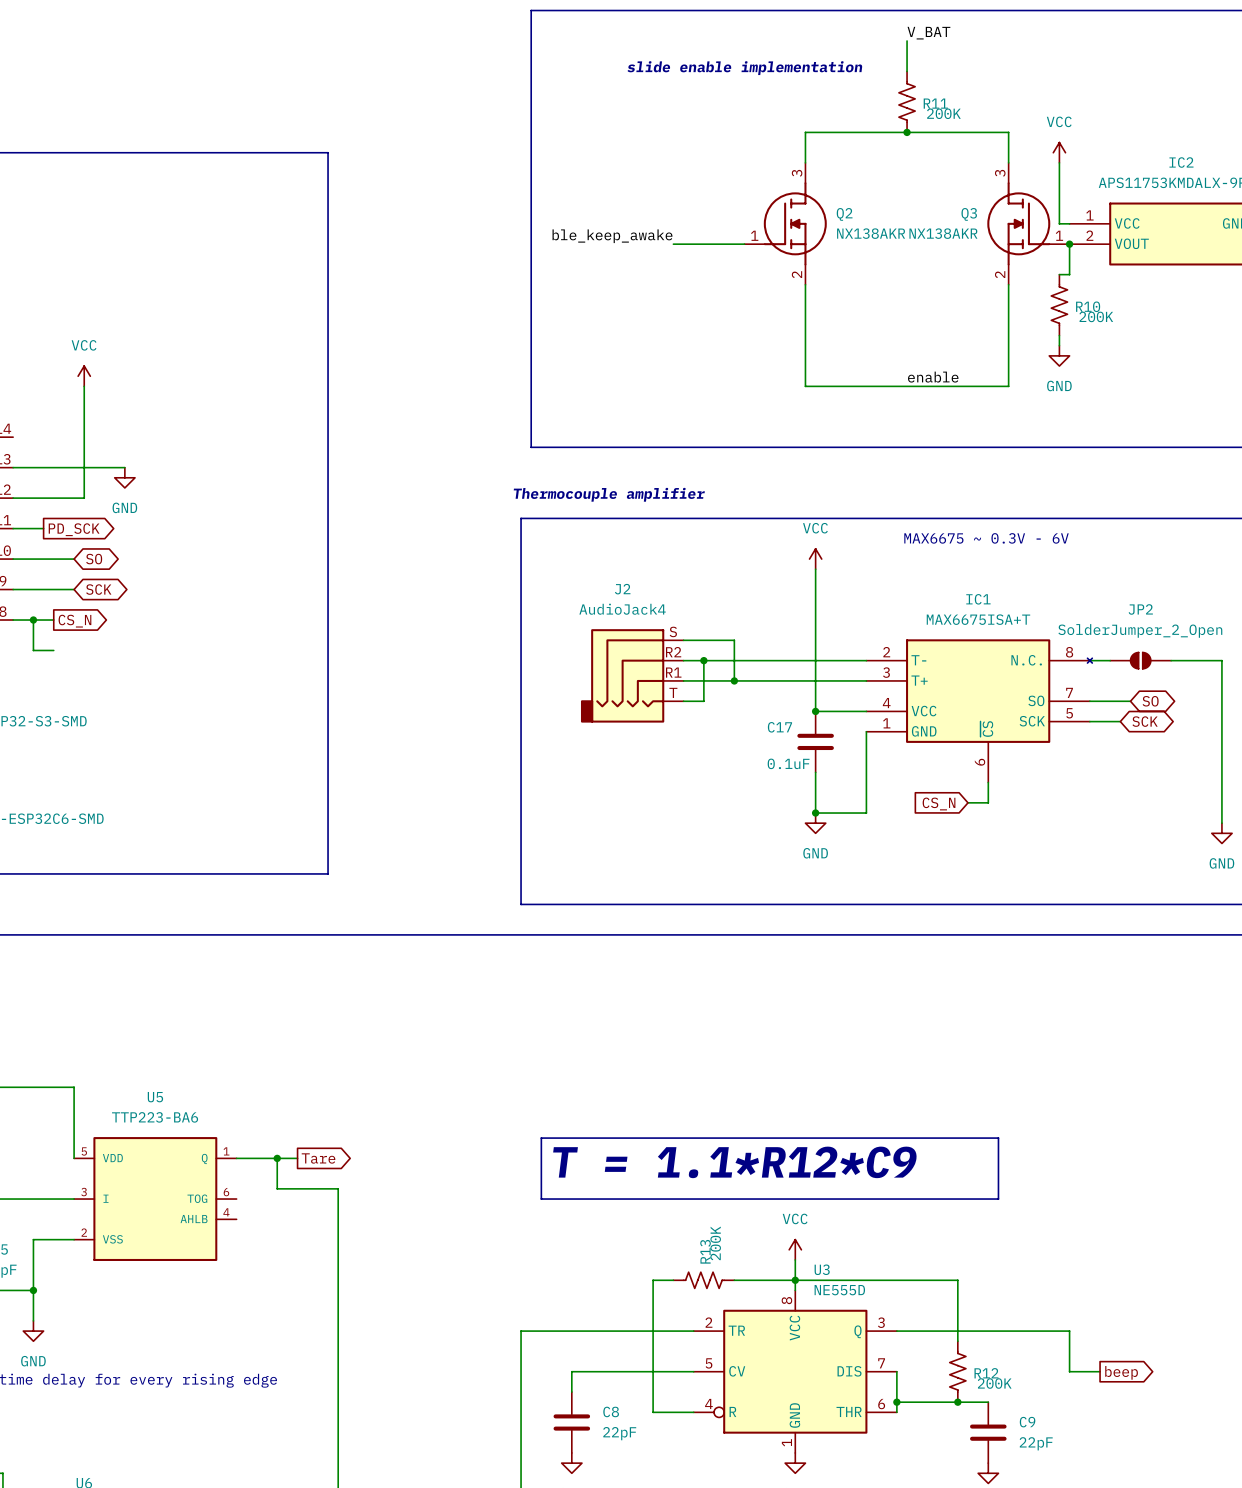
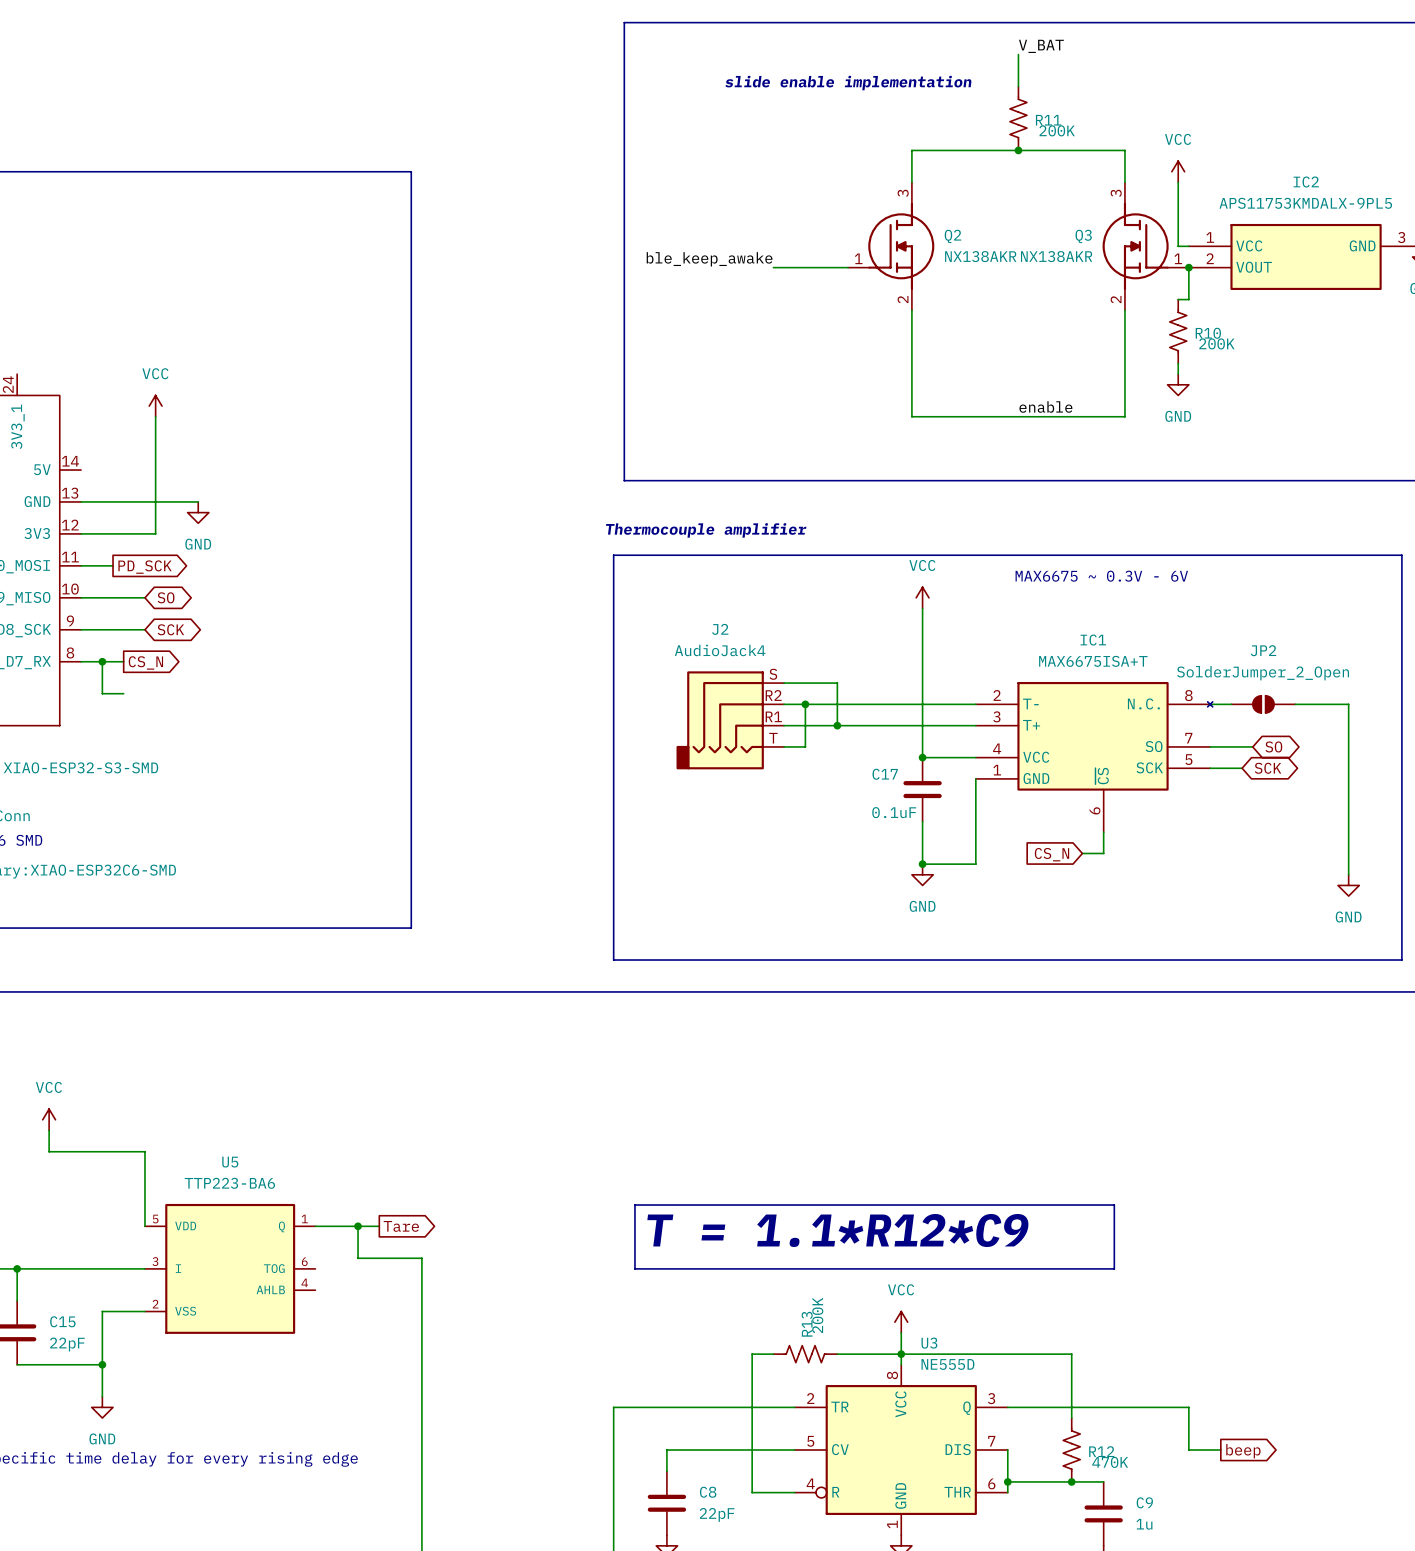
R12 value: 200K (994, 1383) -> 470K (1110, 1462)
C9 value: 22pF (1036, 1443) -> 1u (1144, 1524)

